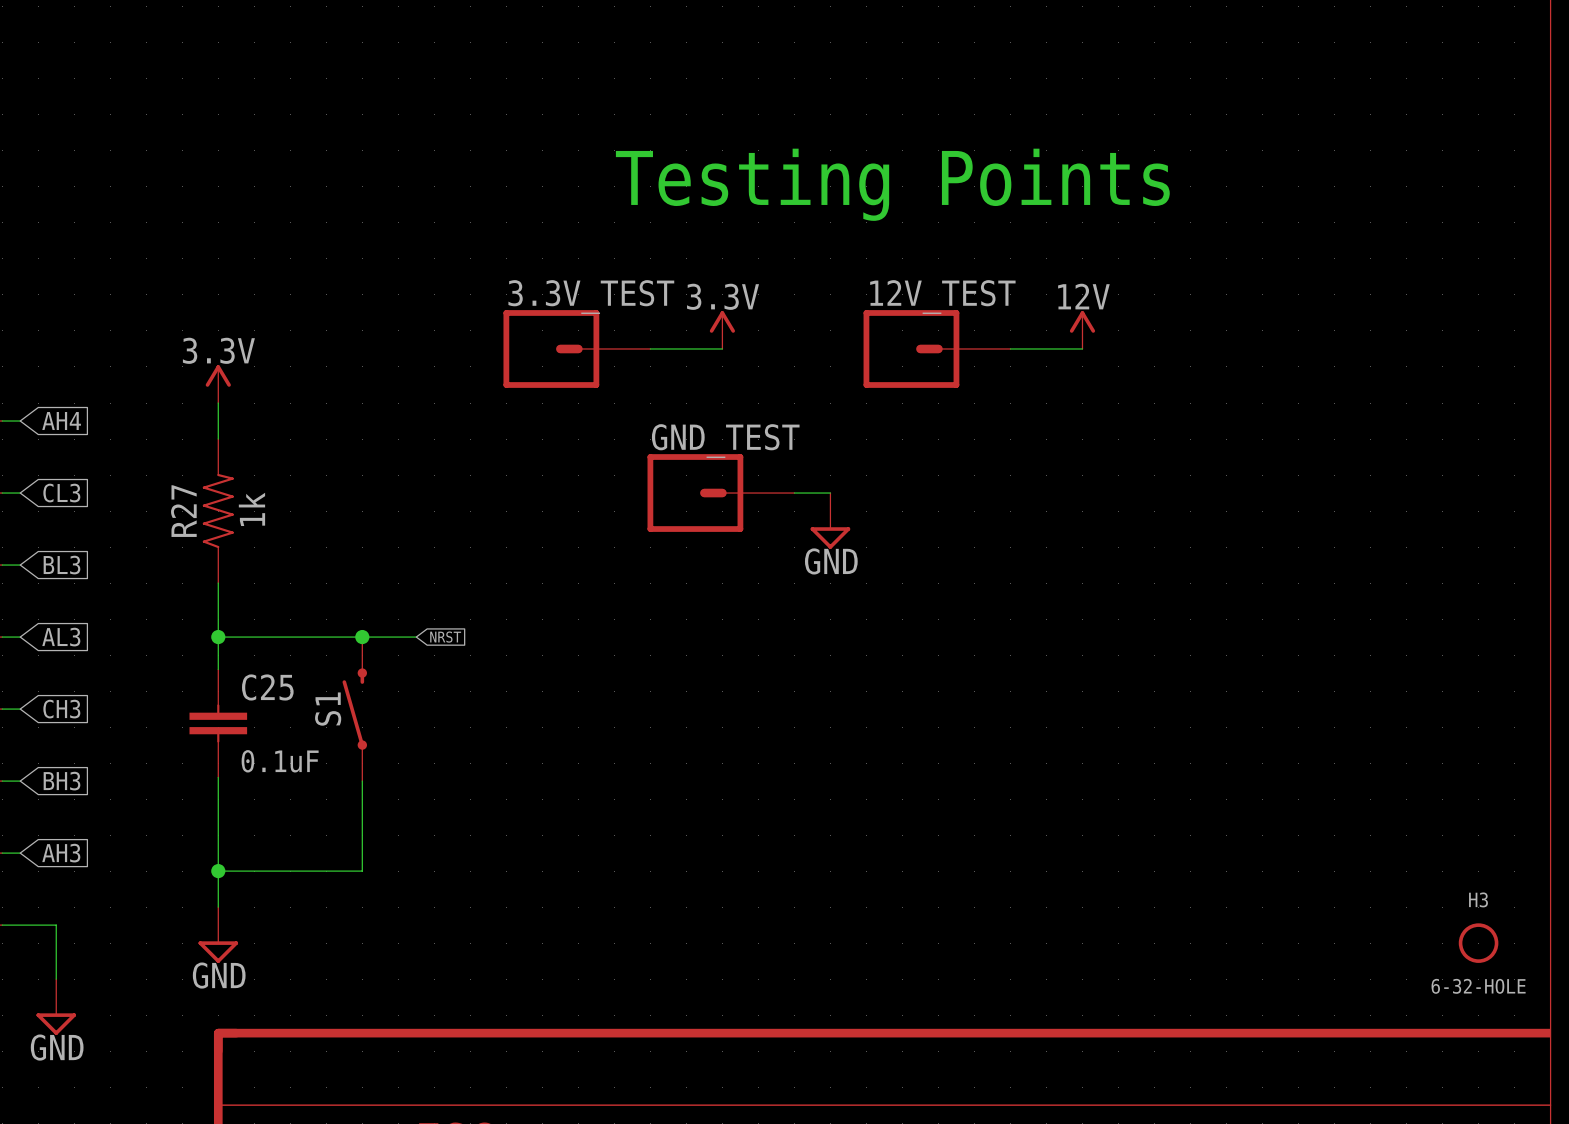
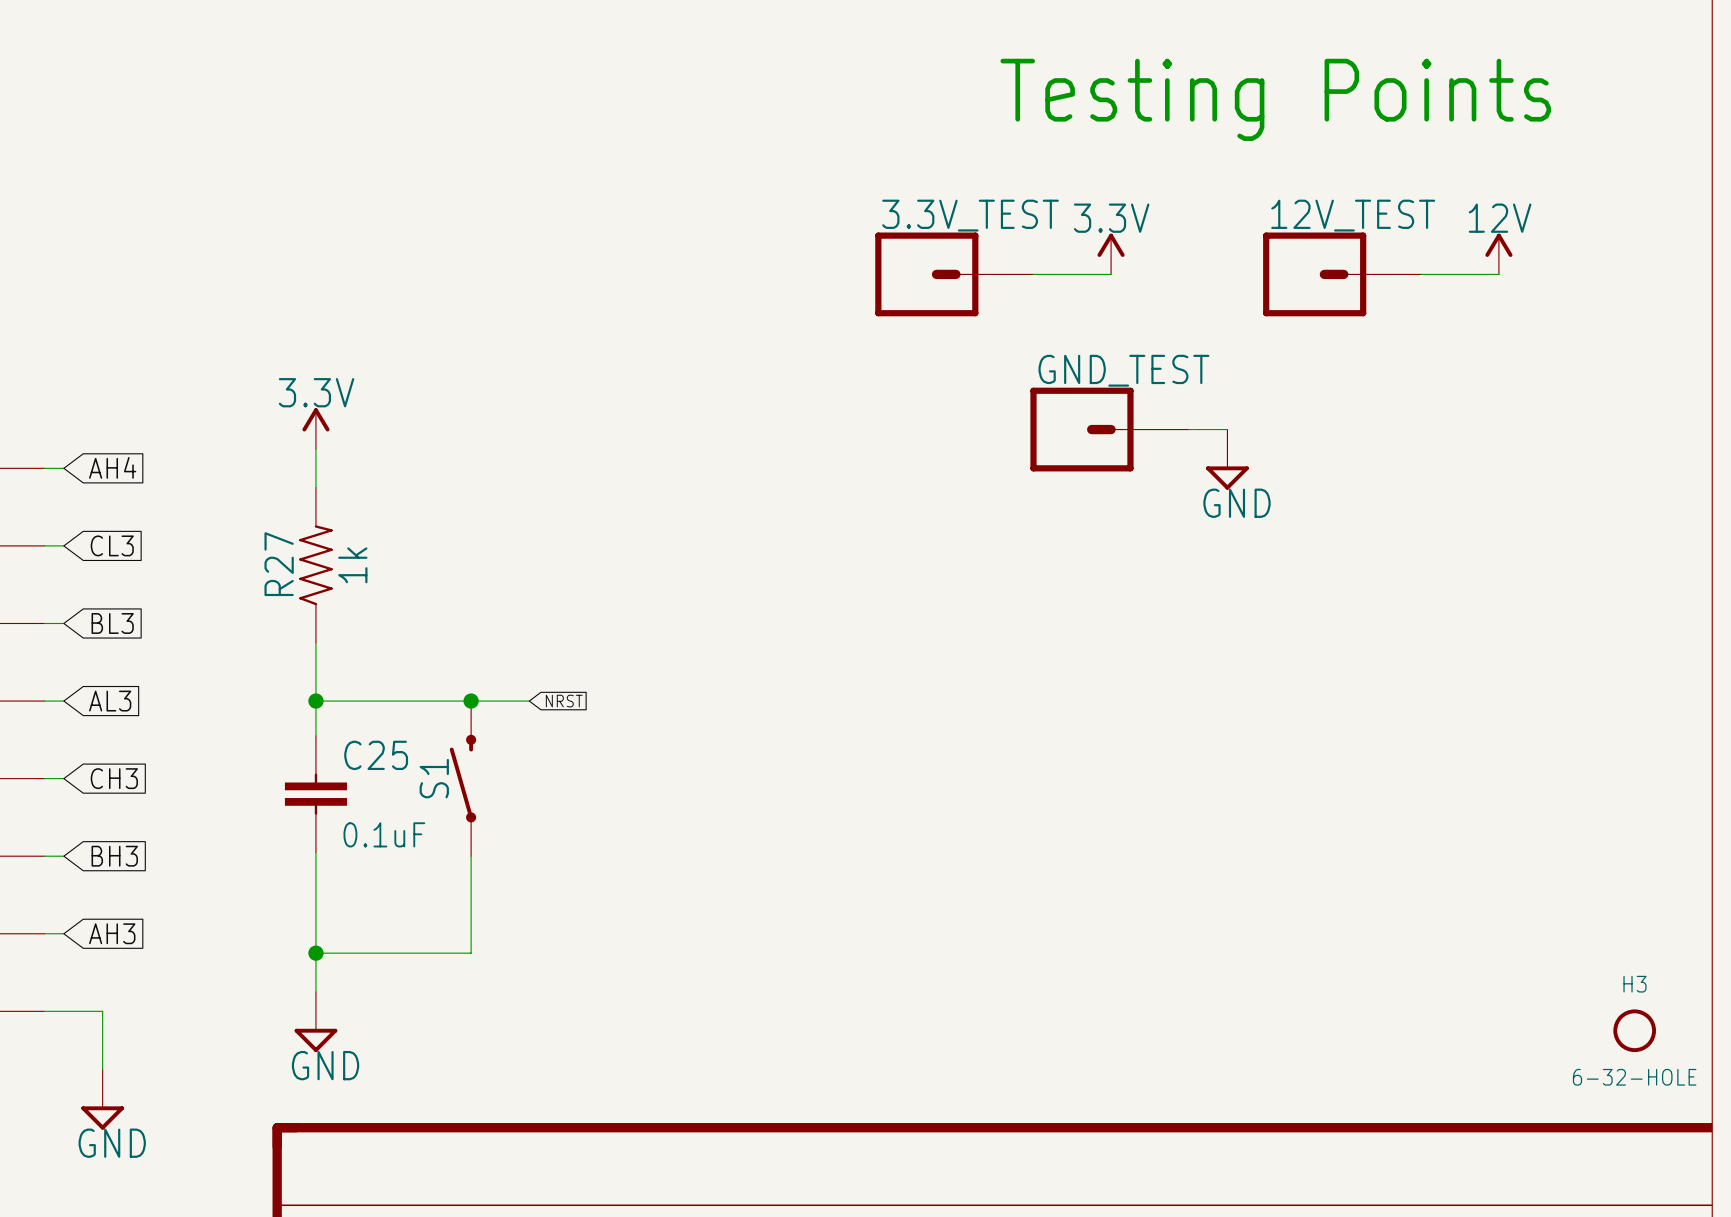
text position: Testing Points (892, 184) -> Testing Points (1275, 99)
power symbol: none -> 3.3V (1111, 254)
power symbol: 3.3V (722, 330) -> none
power symbol position: 12V (1082, 330) -> 12V (1498, 254)
3.3V_TEST position: (576, 348) -> (954, 274)
wire: (650, 348) (722, 348) -> (1033, 274) (1111, 274)
12V_TEST position: (937, 348) -> (1342, 274)
wire: (1010, 348) (1082, 348) -> (1421, 274) (1498, 274)
power symbol position: 3.3V (218, 384) -> 3.3V (315, 428)
wire: (218, 403) (218, 439) -> (315, 448) (315, 487)
GND_TEST position: (720, 493) -> (1109, 429)
wire: (794, 493) (830, 493) -> (1188, 429) (1227, 429)
R27 position: (218, 511) -> (315, 565)
power symbol position: GND (830, 520) -> GND (1227, 459)
wire: (218, 583) (218, 669) -> (315, 642) (315, 735)
wire: (218, 637) (254, 637) -> (490, 701) (529, 701)
junction position: (218, 637) -> (315, 701)
junction position: (362, 637) -> (471, 701)
global label position: NRST (445, 637) -> NRST (564, 701)
S1 position: (354, 709) -> (462, 778)
C25 position: (218, 723) -> (315, 794)
wire: (218, 777) (218, 907) -> (315, 852) (315, 991)
wire: (362, 781) (362, 871) -> (471, 856) (471, 953) (432, 953)
wire: (218, 871) (254, 871) -> none
junction position: (218, 871) -> (315, 953)
power symbol position: GND (218, 935) -> GND (315, 1022)

